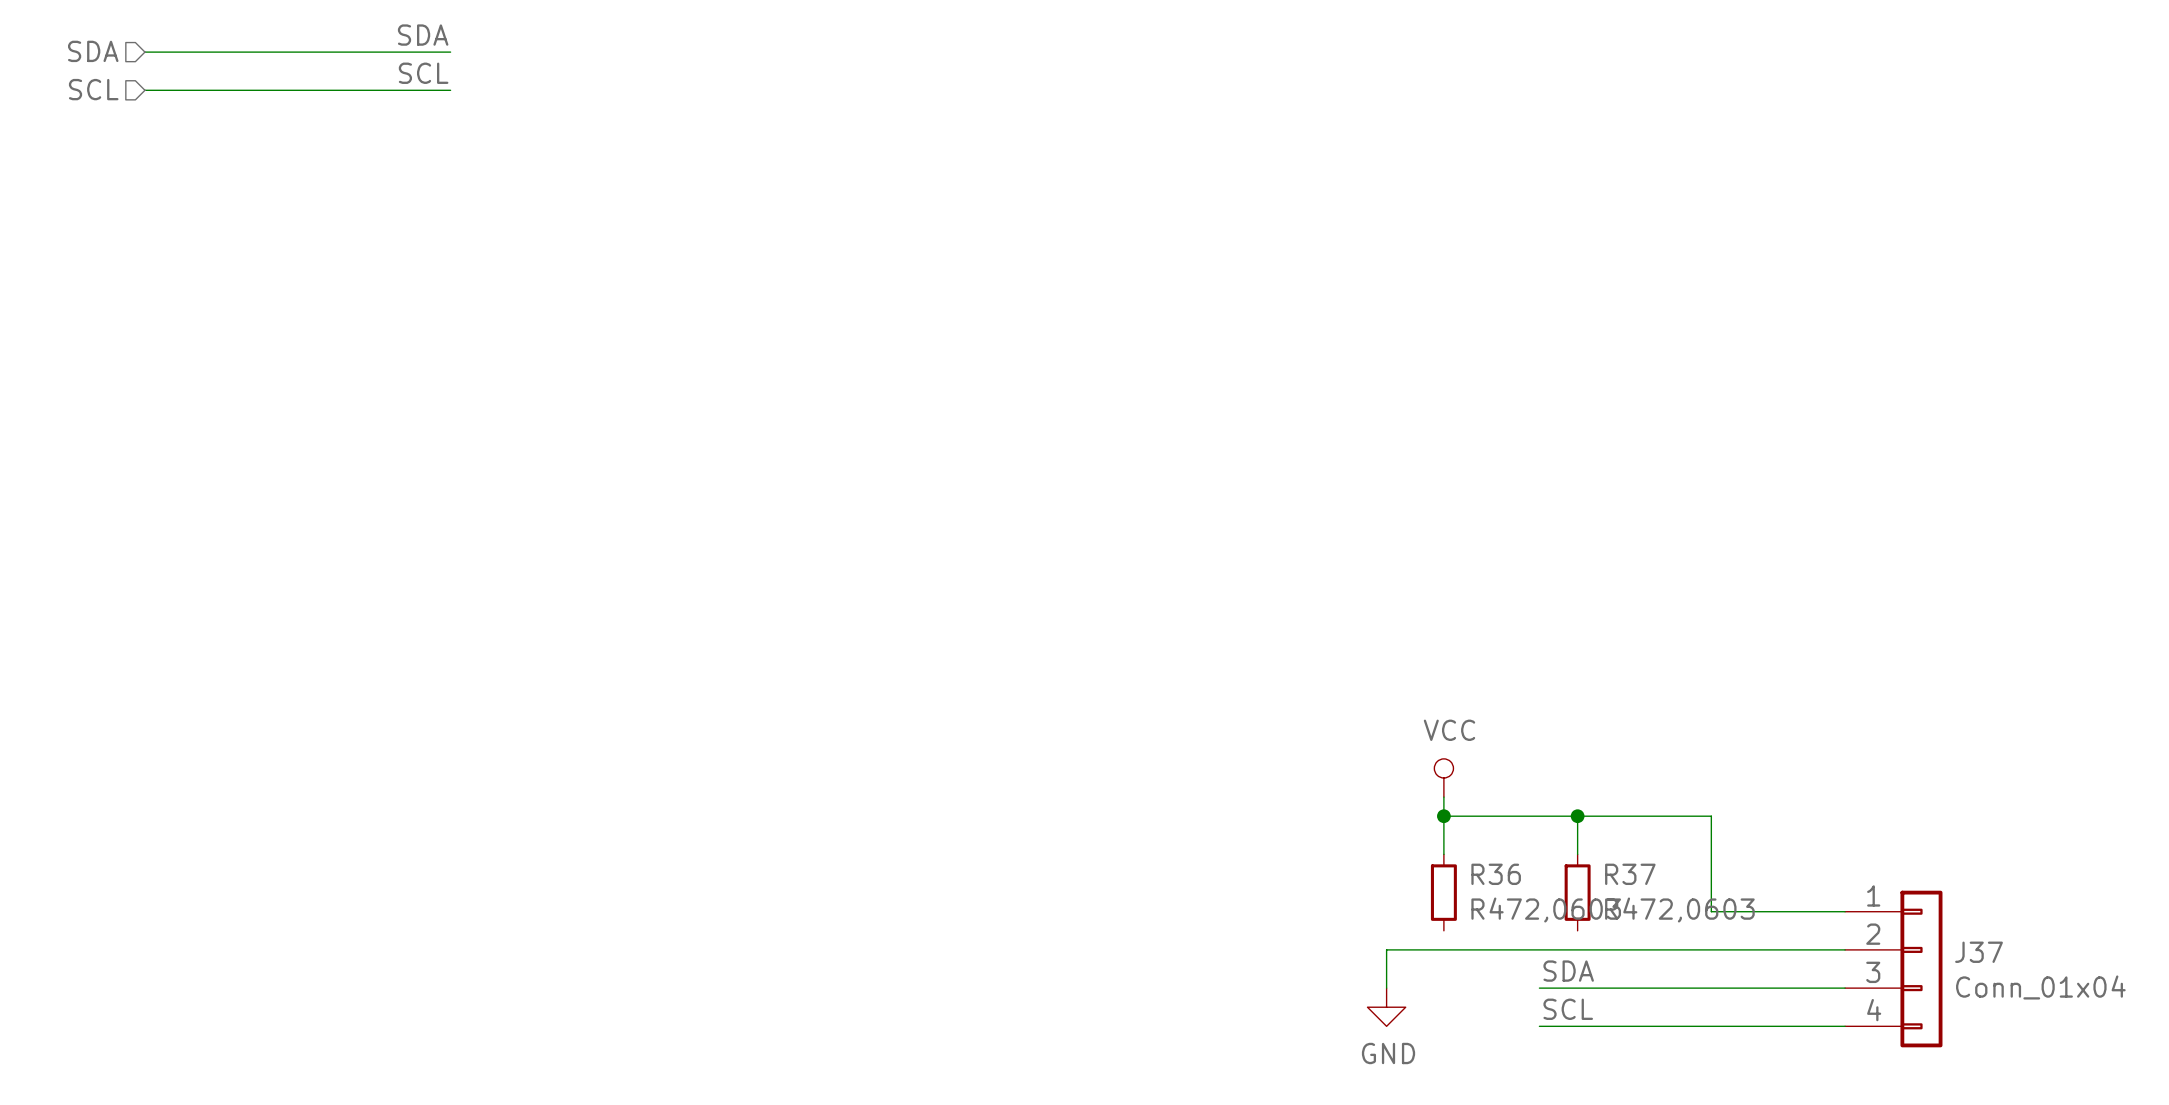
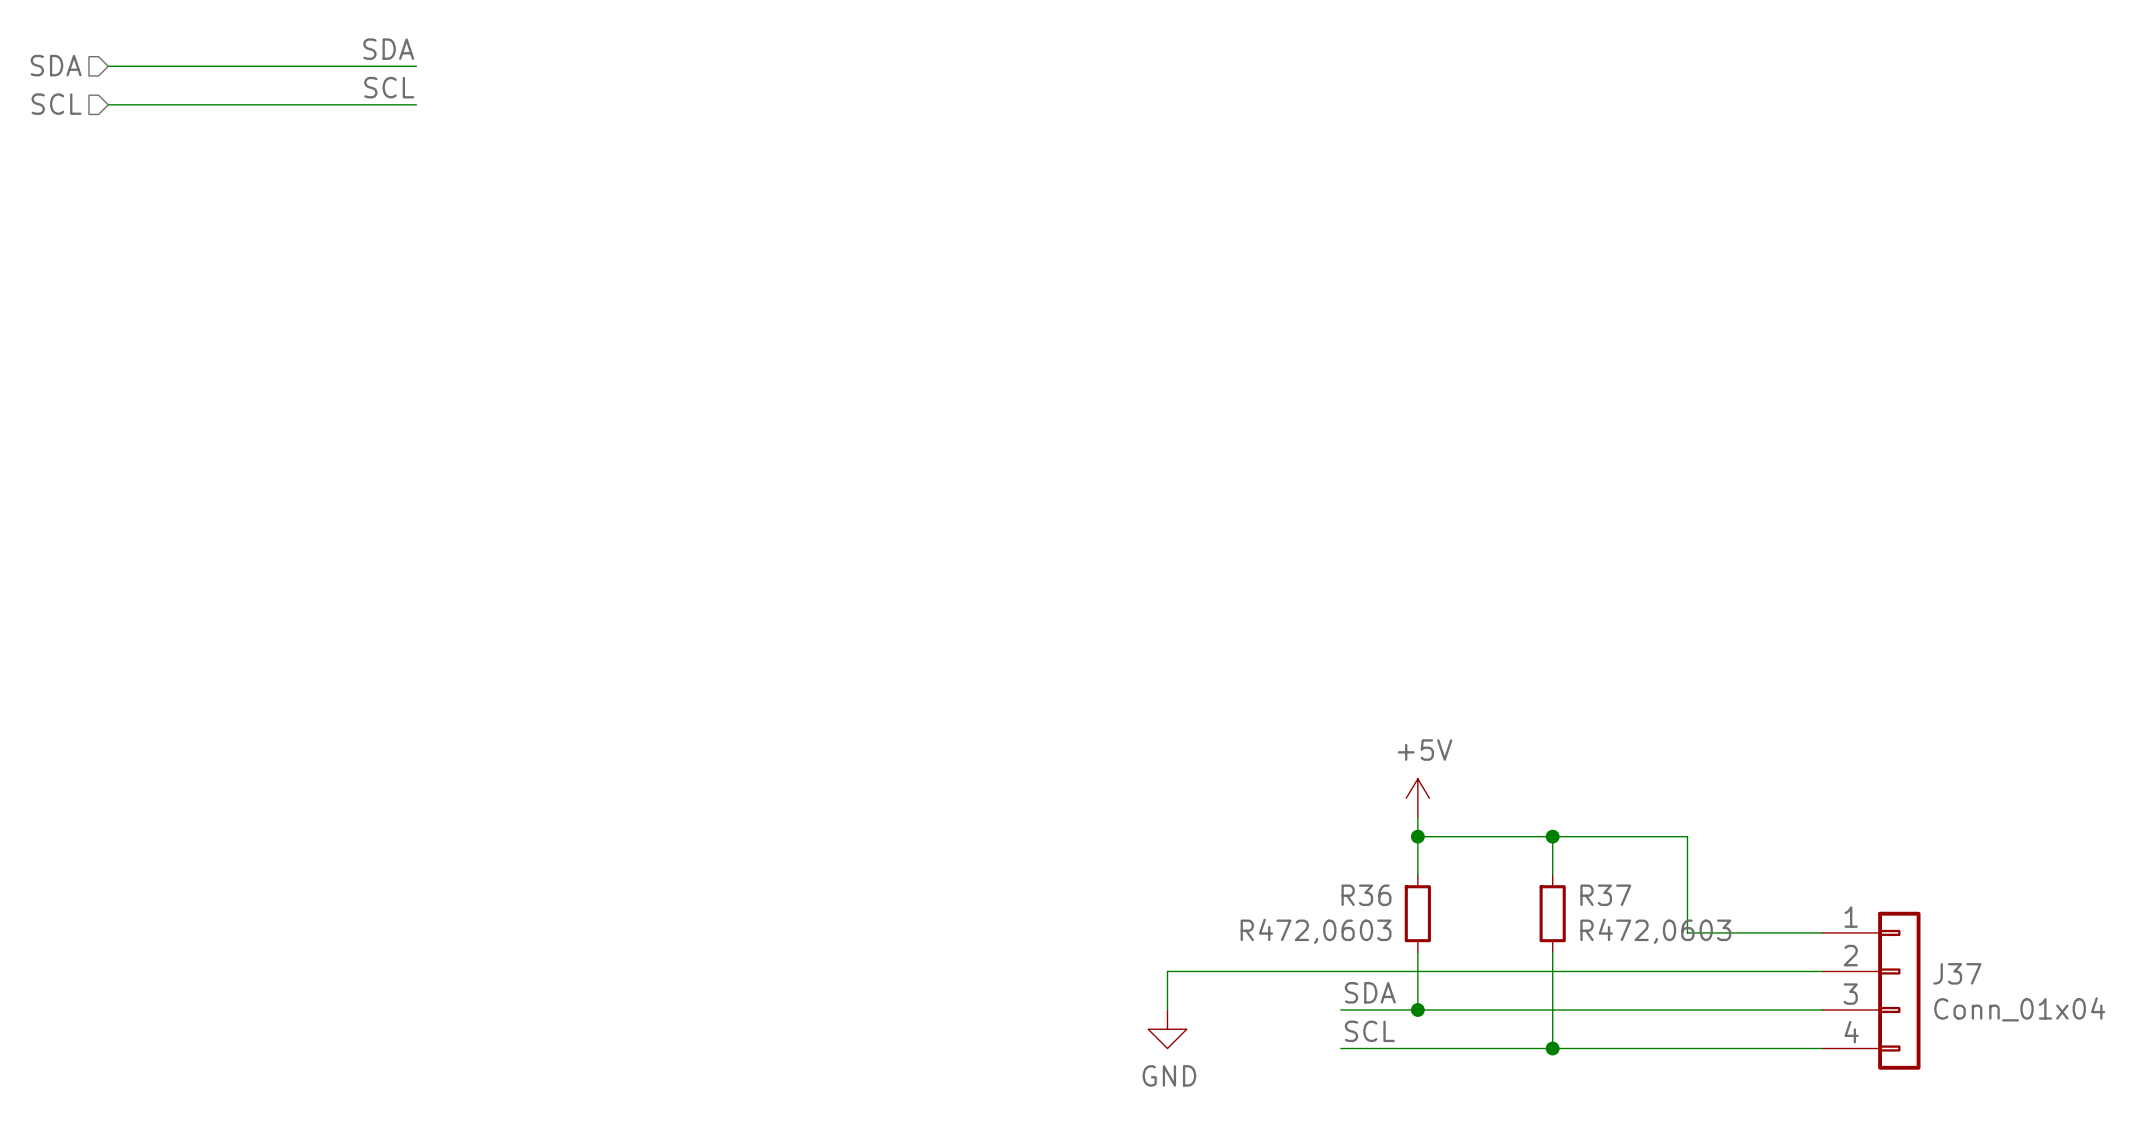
power symbol: VCC (1443, 777) -> +5V (1417, 798)
R36 name position: R36 (1496, 874) -> R36 (1366, 895)
R36 value position: R472,0603 (1546, 909) -> R472,0603 (1316, 931)
wire: none -> (1417, 952) (1417, 1009)
wire: none -> (1552, 952) (1552, 1048)
wire: (1386, 949) (1386, 988) -> (1360, 971) (1167, 971) (1167, 1009)
label position: SDA (1568, 971) -> SDA (1370, 992)
wire: none -> (1340, 1009) (1514, 1009)
junction: none -> (1417, 1009)
power symbol position: GND (1386, 1007) -> GND (1167, 1029)
label position: SCL (1568, 1009) -> SCL (1369, 1031)
wire: none -> (1340, 1048) (1514, 1048)
junction: none -> (1552, 1048)

